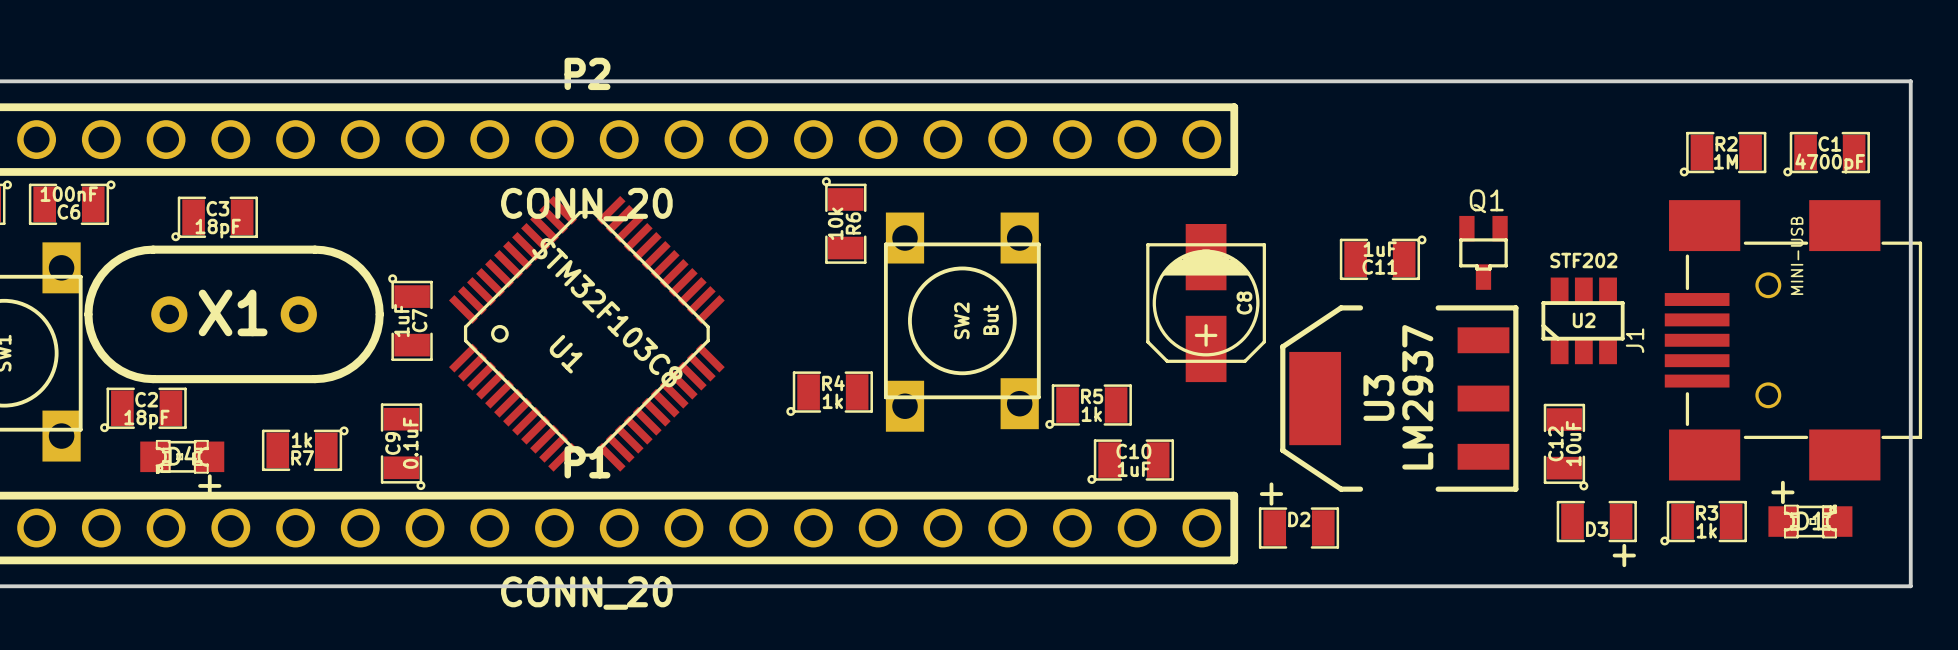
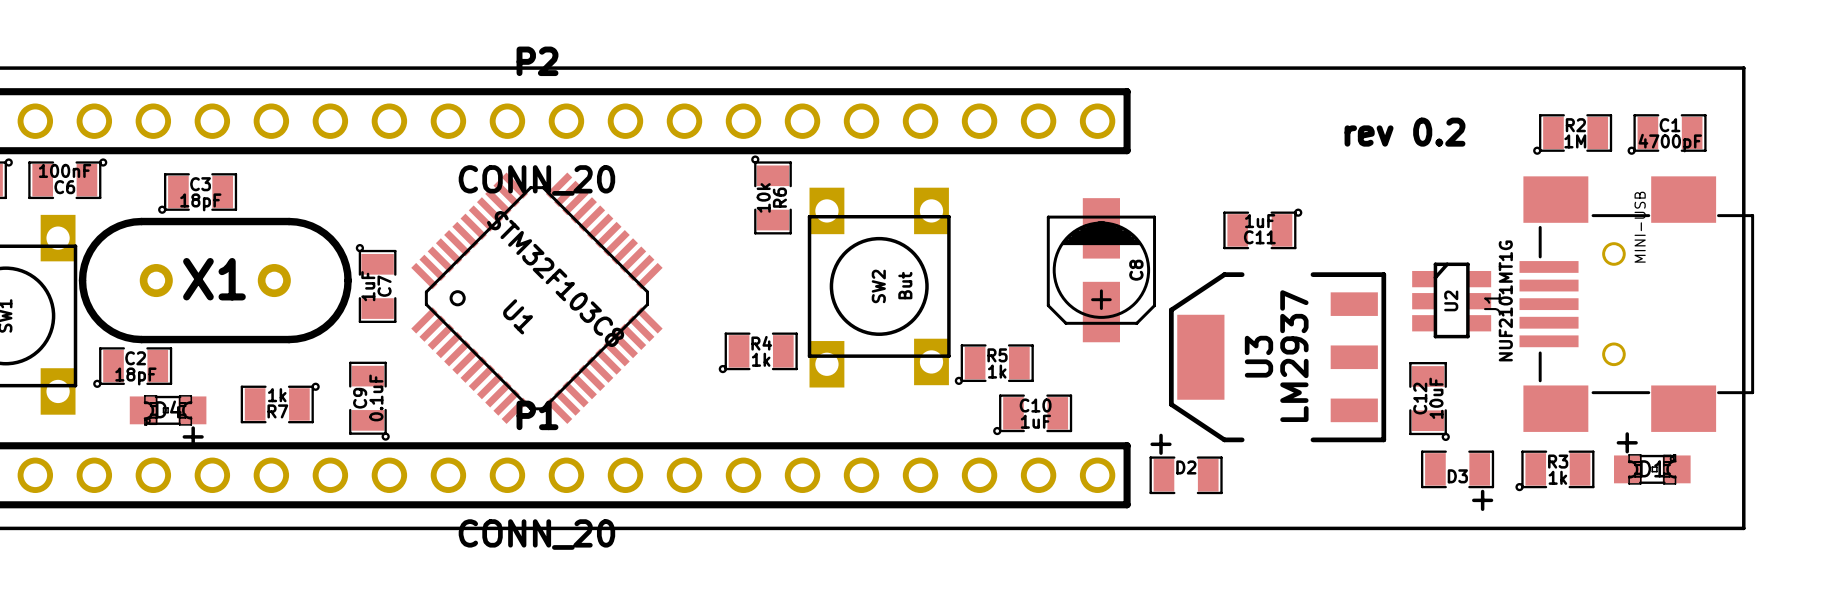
text: none -> rev 0.2 (1405, 132)
Q1: (1483, 252) -> none
U2 value: STF202 (1583, 260) -> NUF2101MT1G (1505, 300)
U2 rotation: 0° (1583, 320) -> 90° clockwise (1451, 300)

